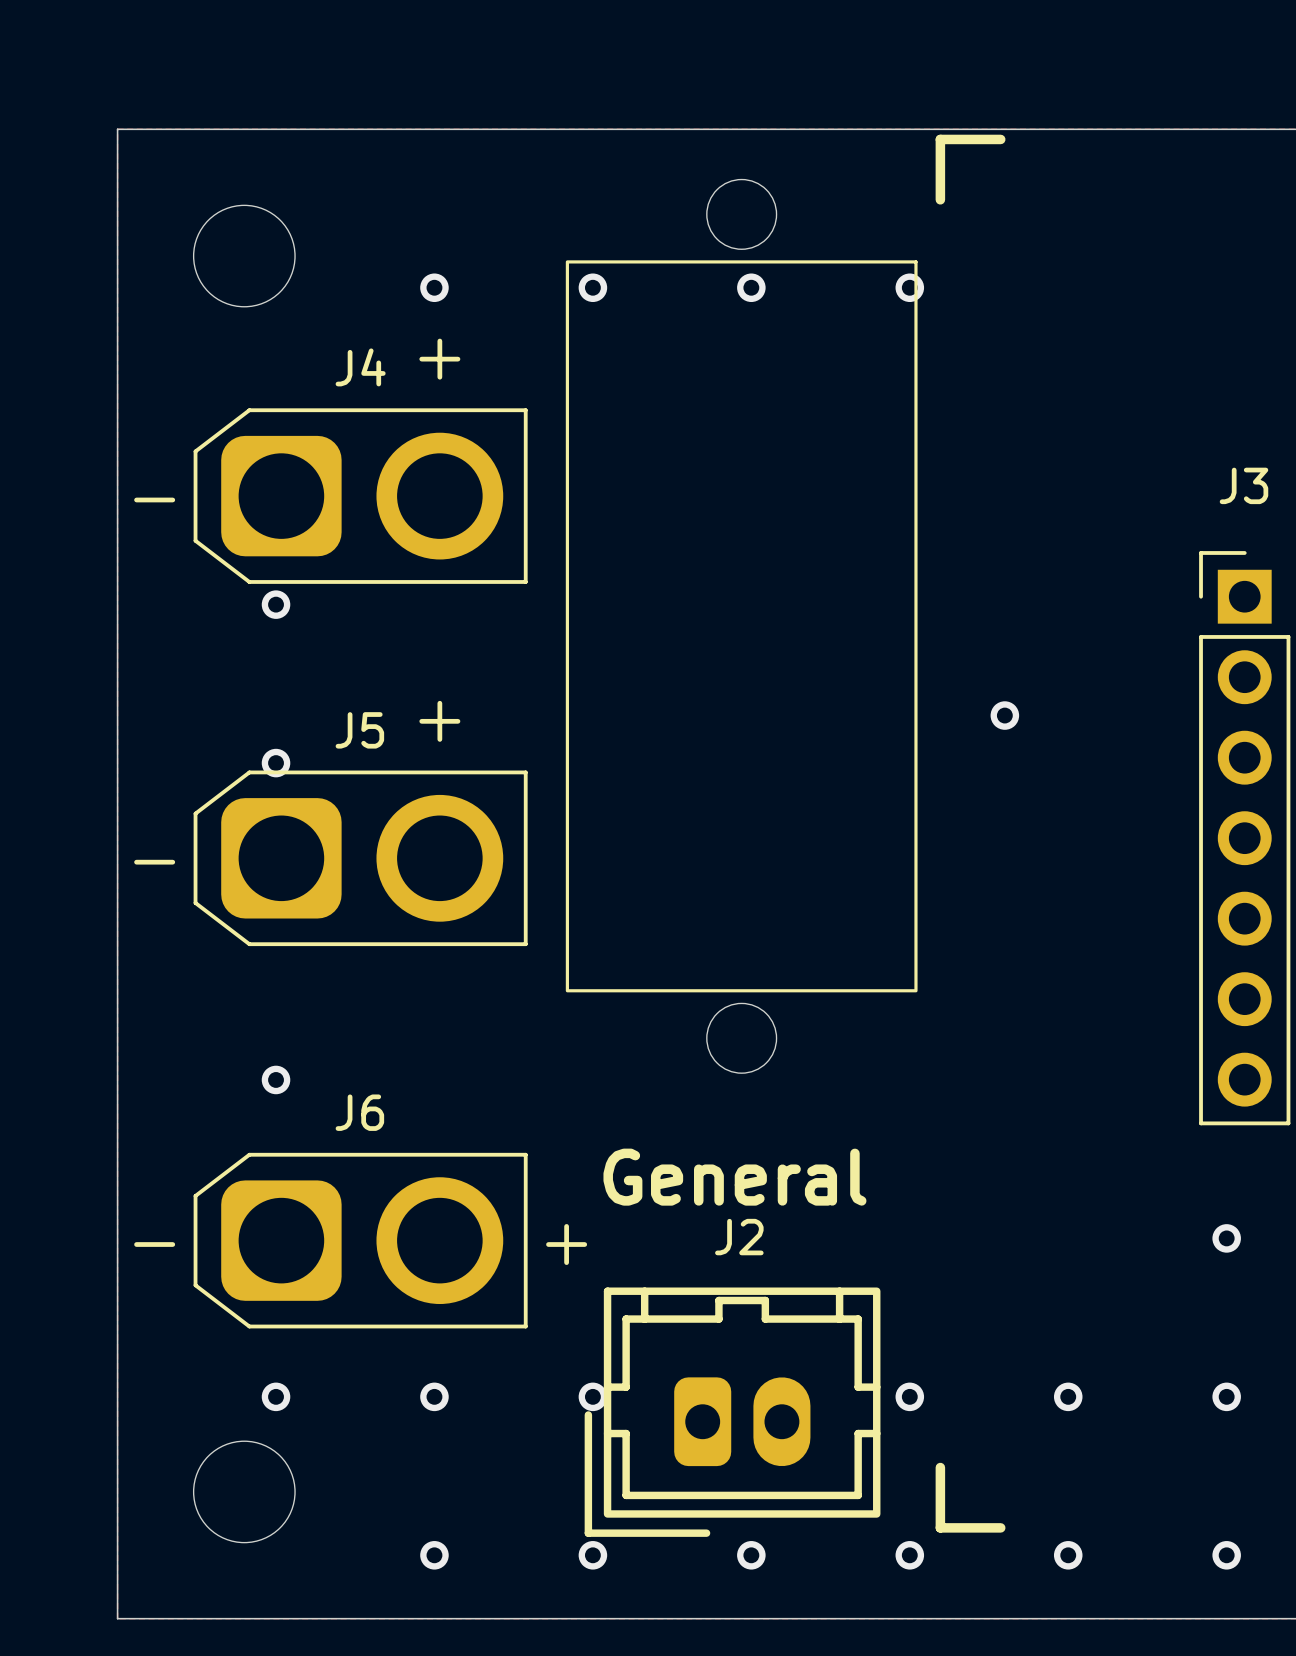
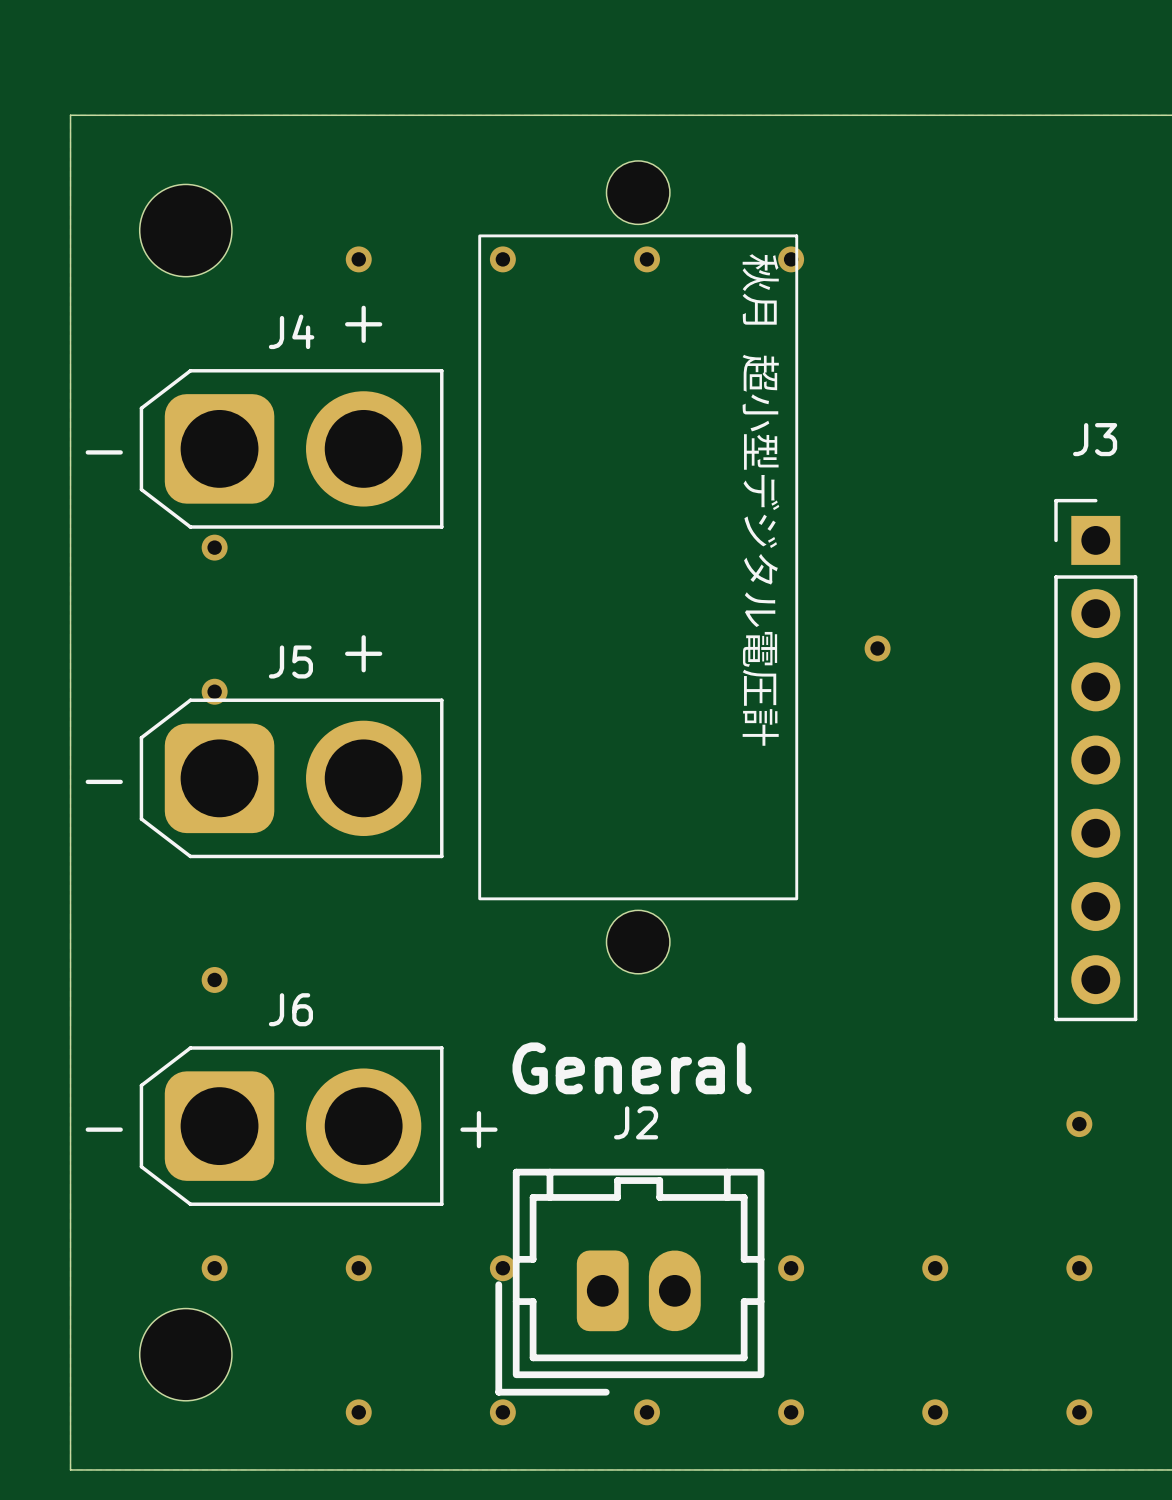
line: (1000, 139) (940, 139) (940, 199) -> none
part text: none -> 秋月 超小型デジタル電圧計 (760, 499)
line: (940, 1467) (940, 1527) (1000, 1527) -> none

